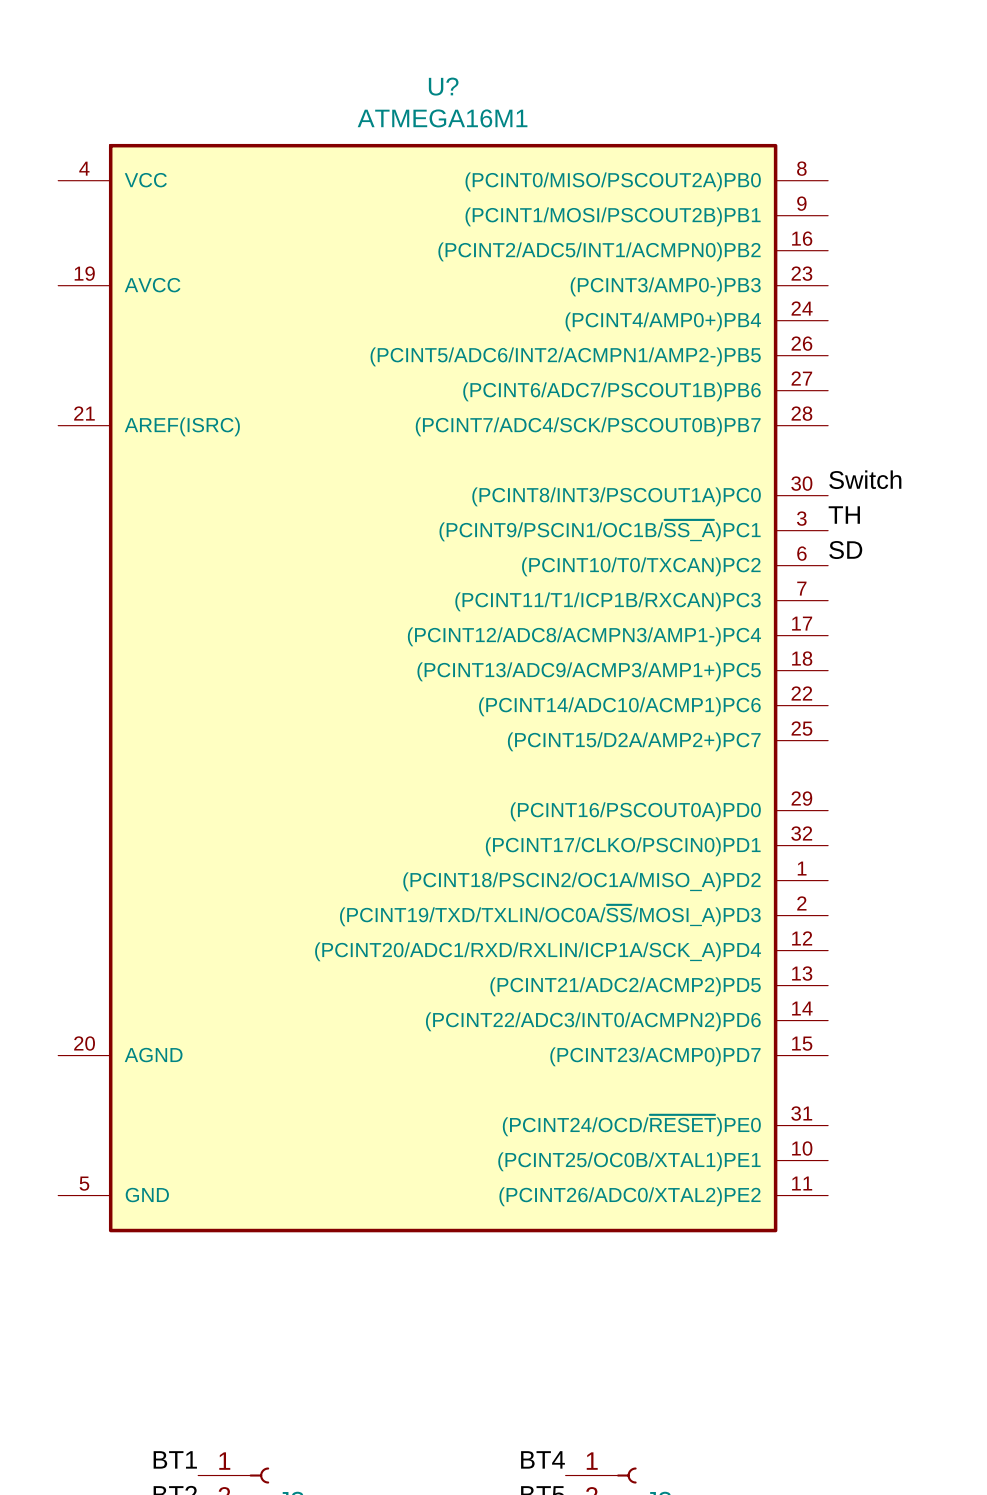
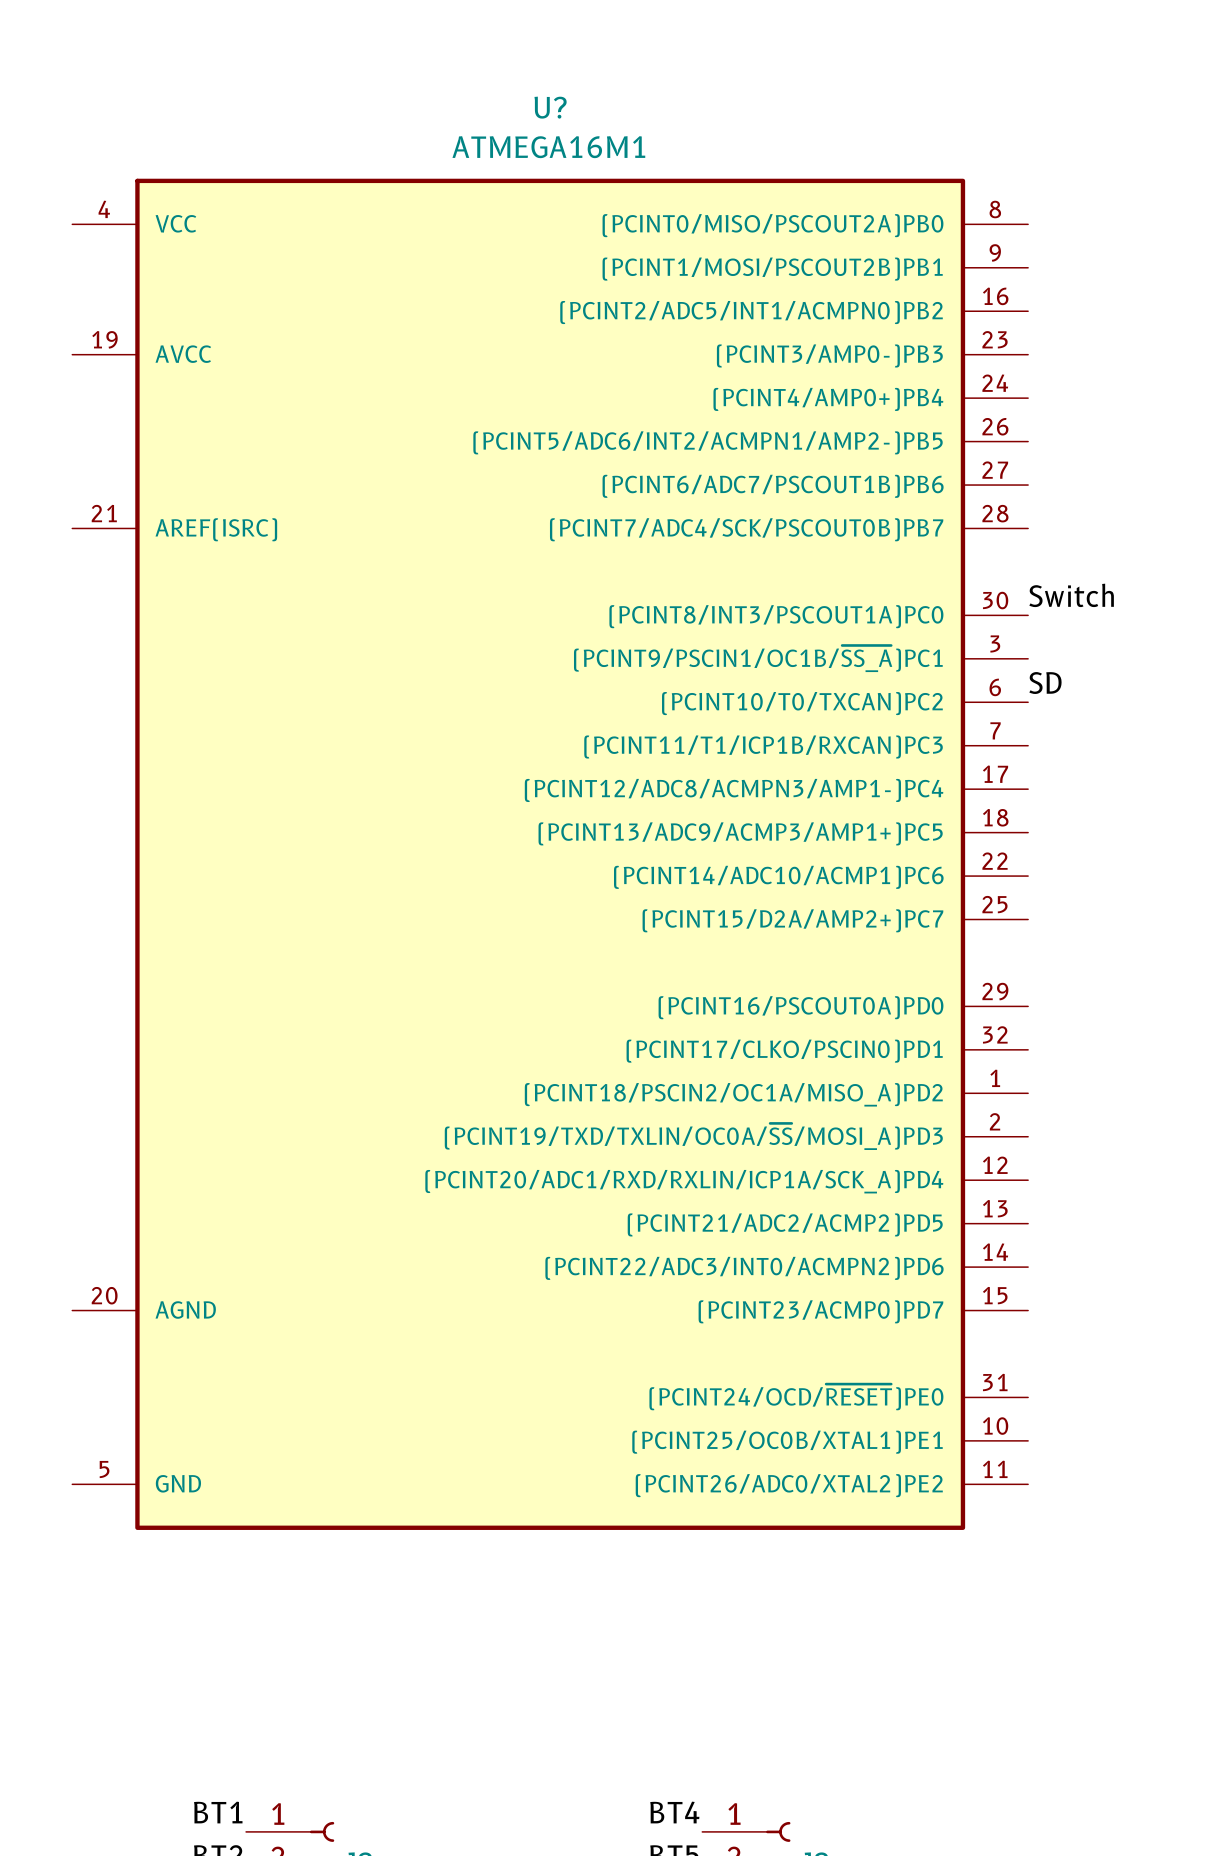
label: TH (844, 515) -> none

